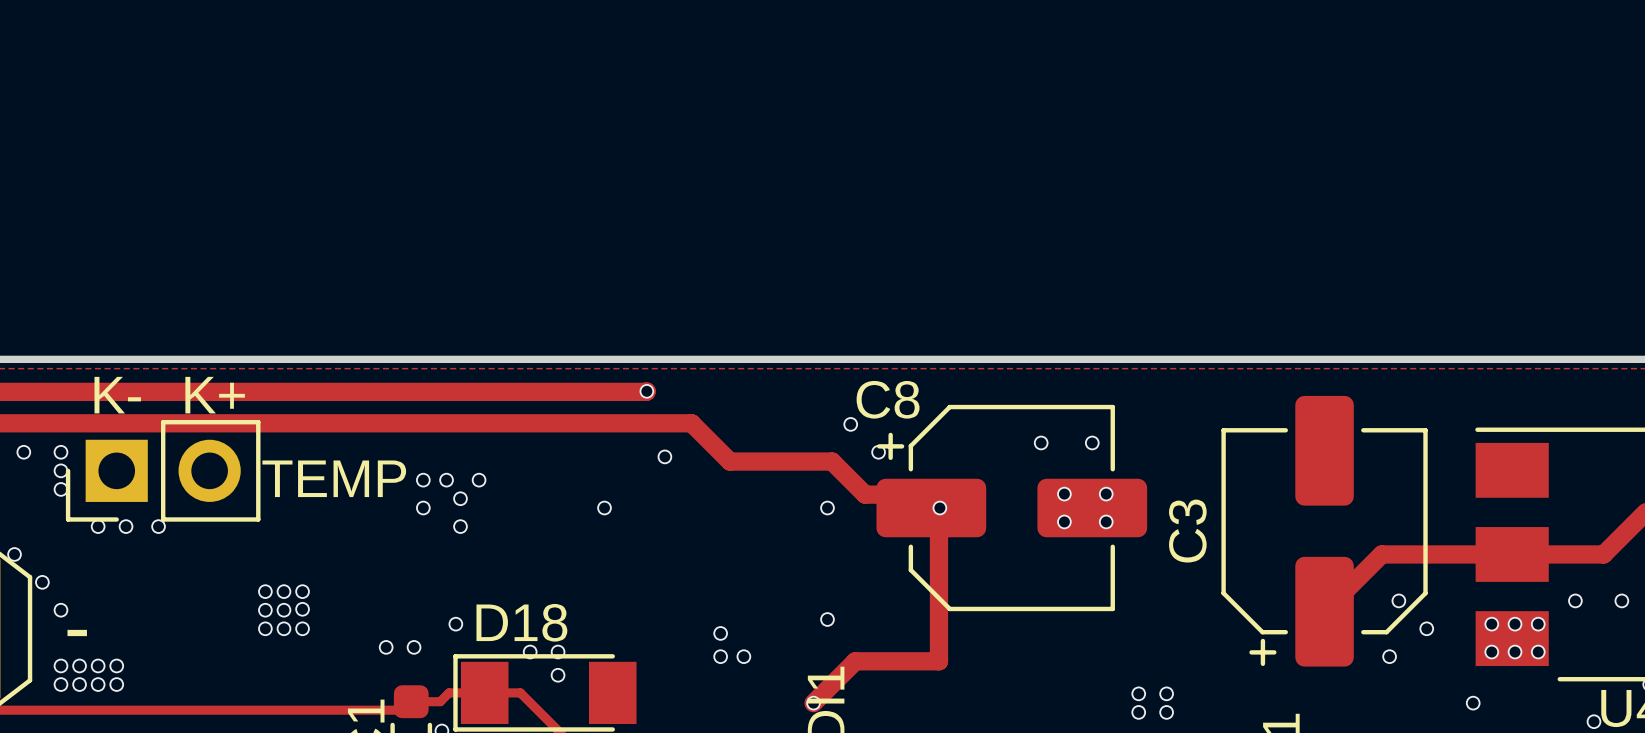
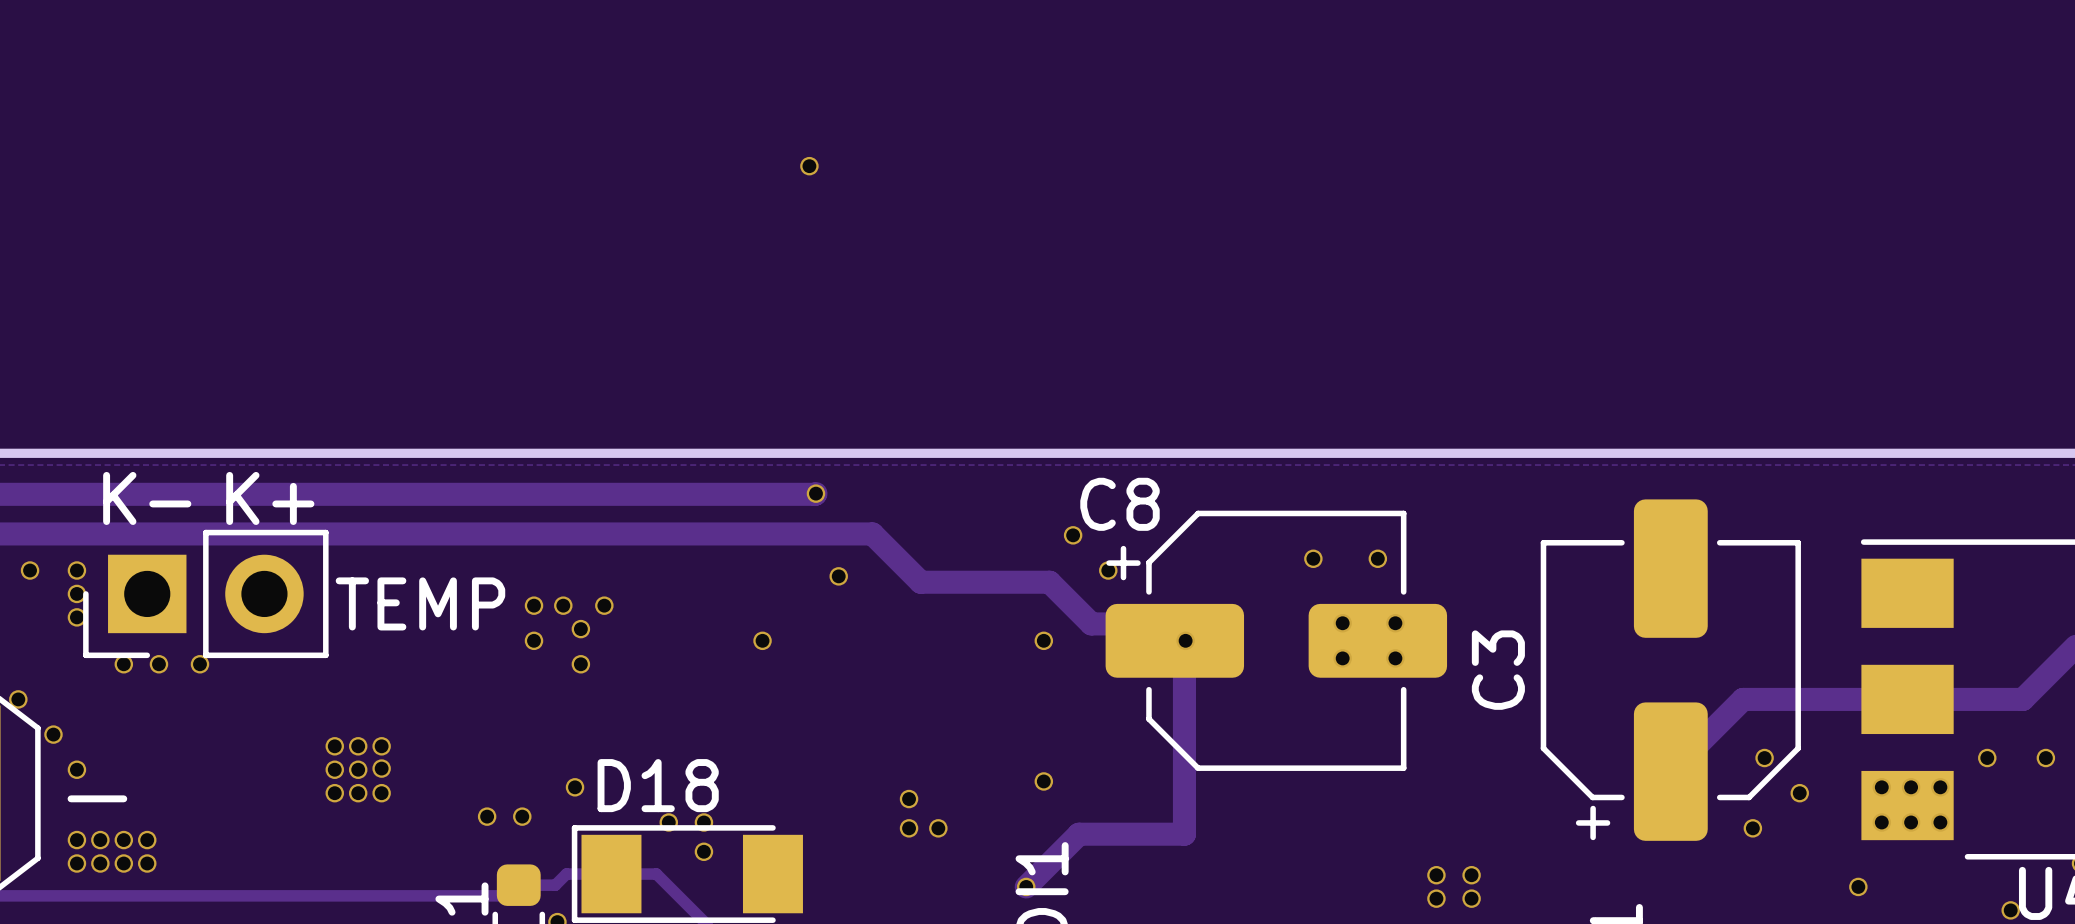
via: none -> (809, 166)

